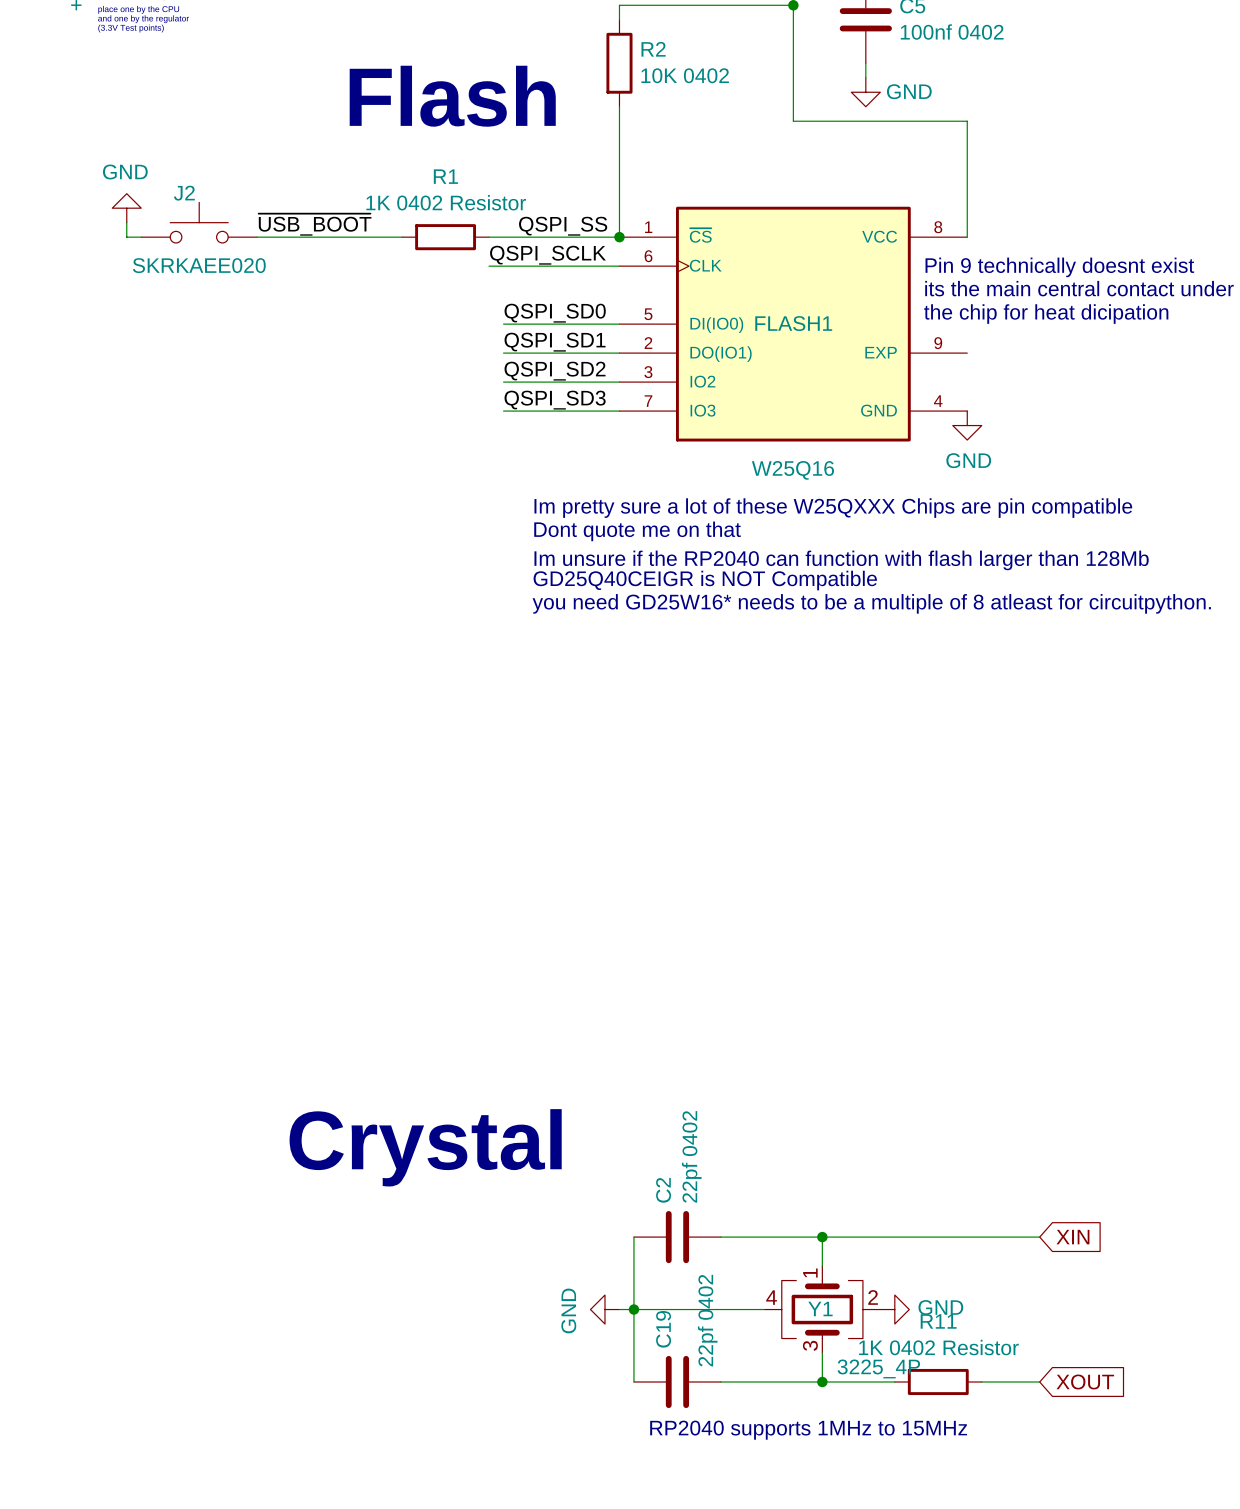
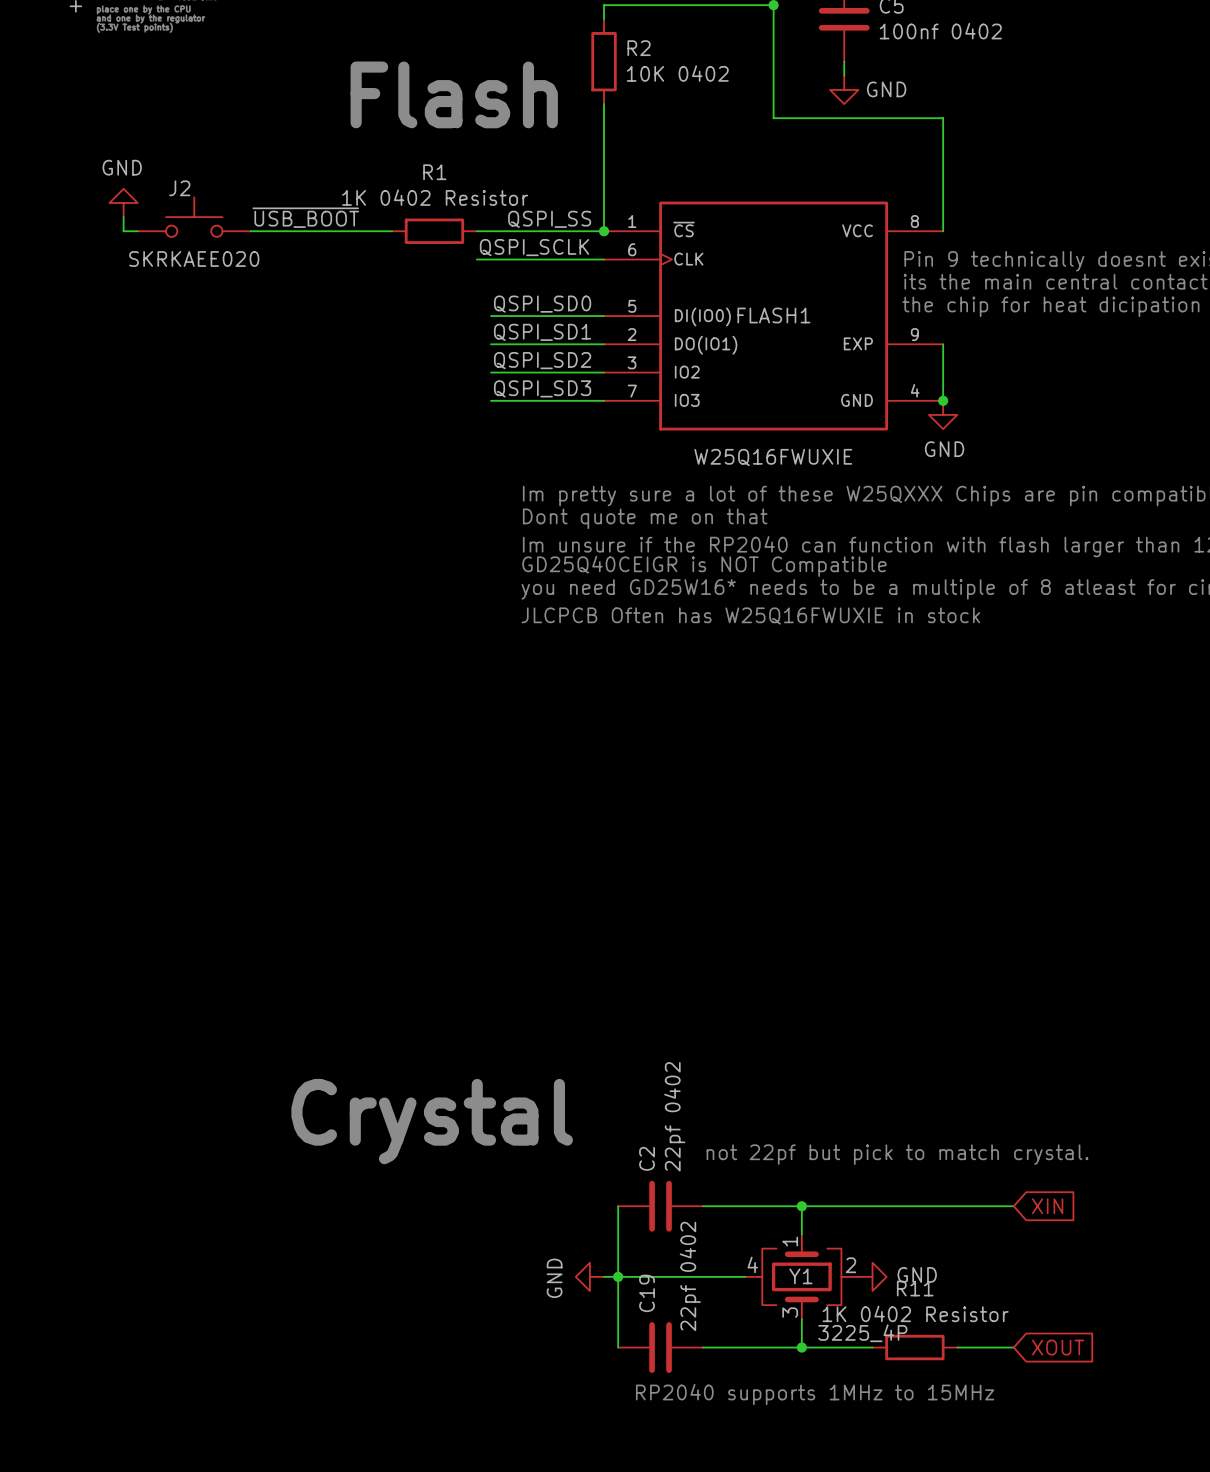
wire: none -> (943, 344) (943, 400)
junction: none -> (943, 400)
FLASH1 value: W25Q16 (792, 470) -> W25Q16FWUXIE (773, 457)
text: none -> JLCPCB Often has W25Q16FWUXIE in stock (750, 616)
text: none -> not 22pf but pick to match crystal. (897, 1154)

